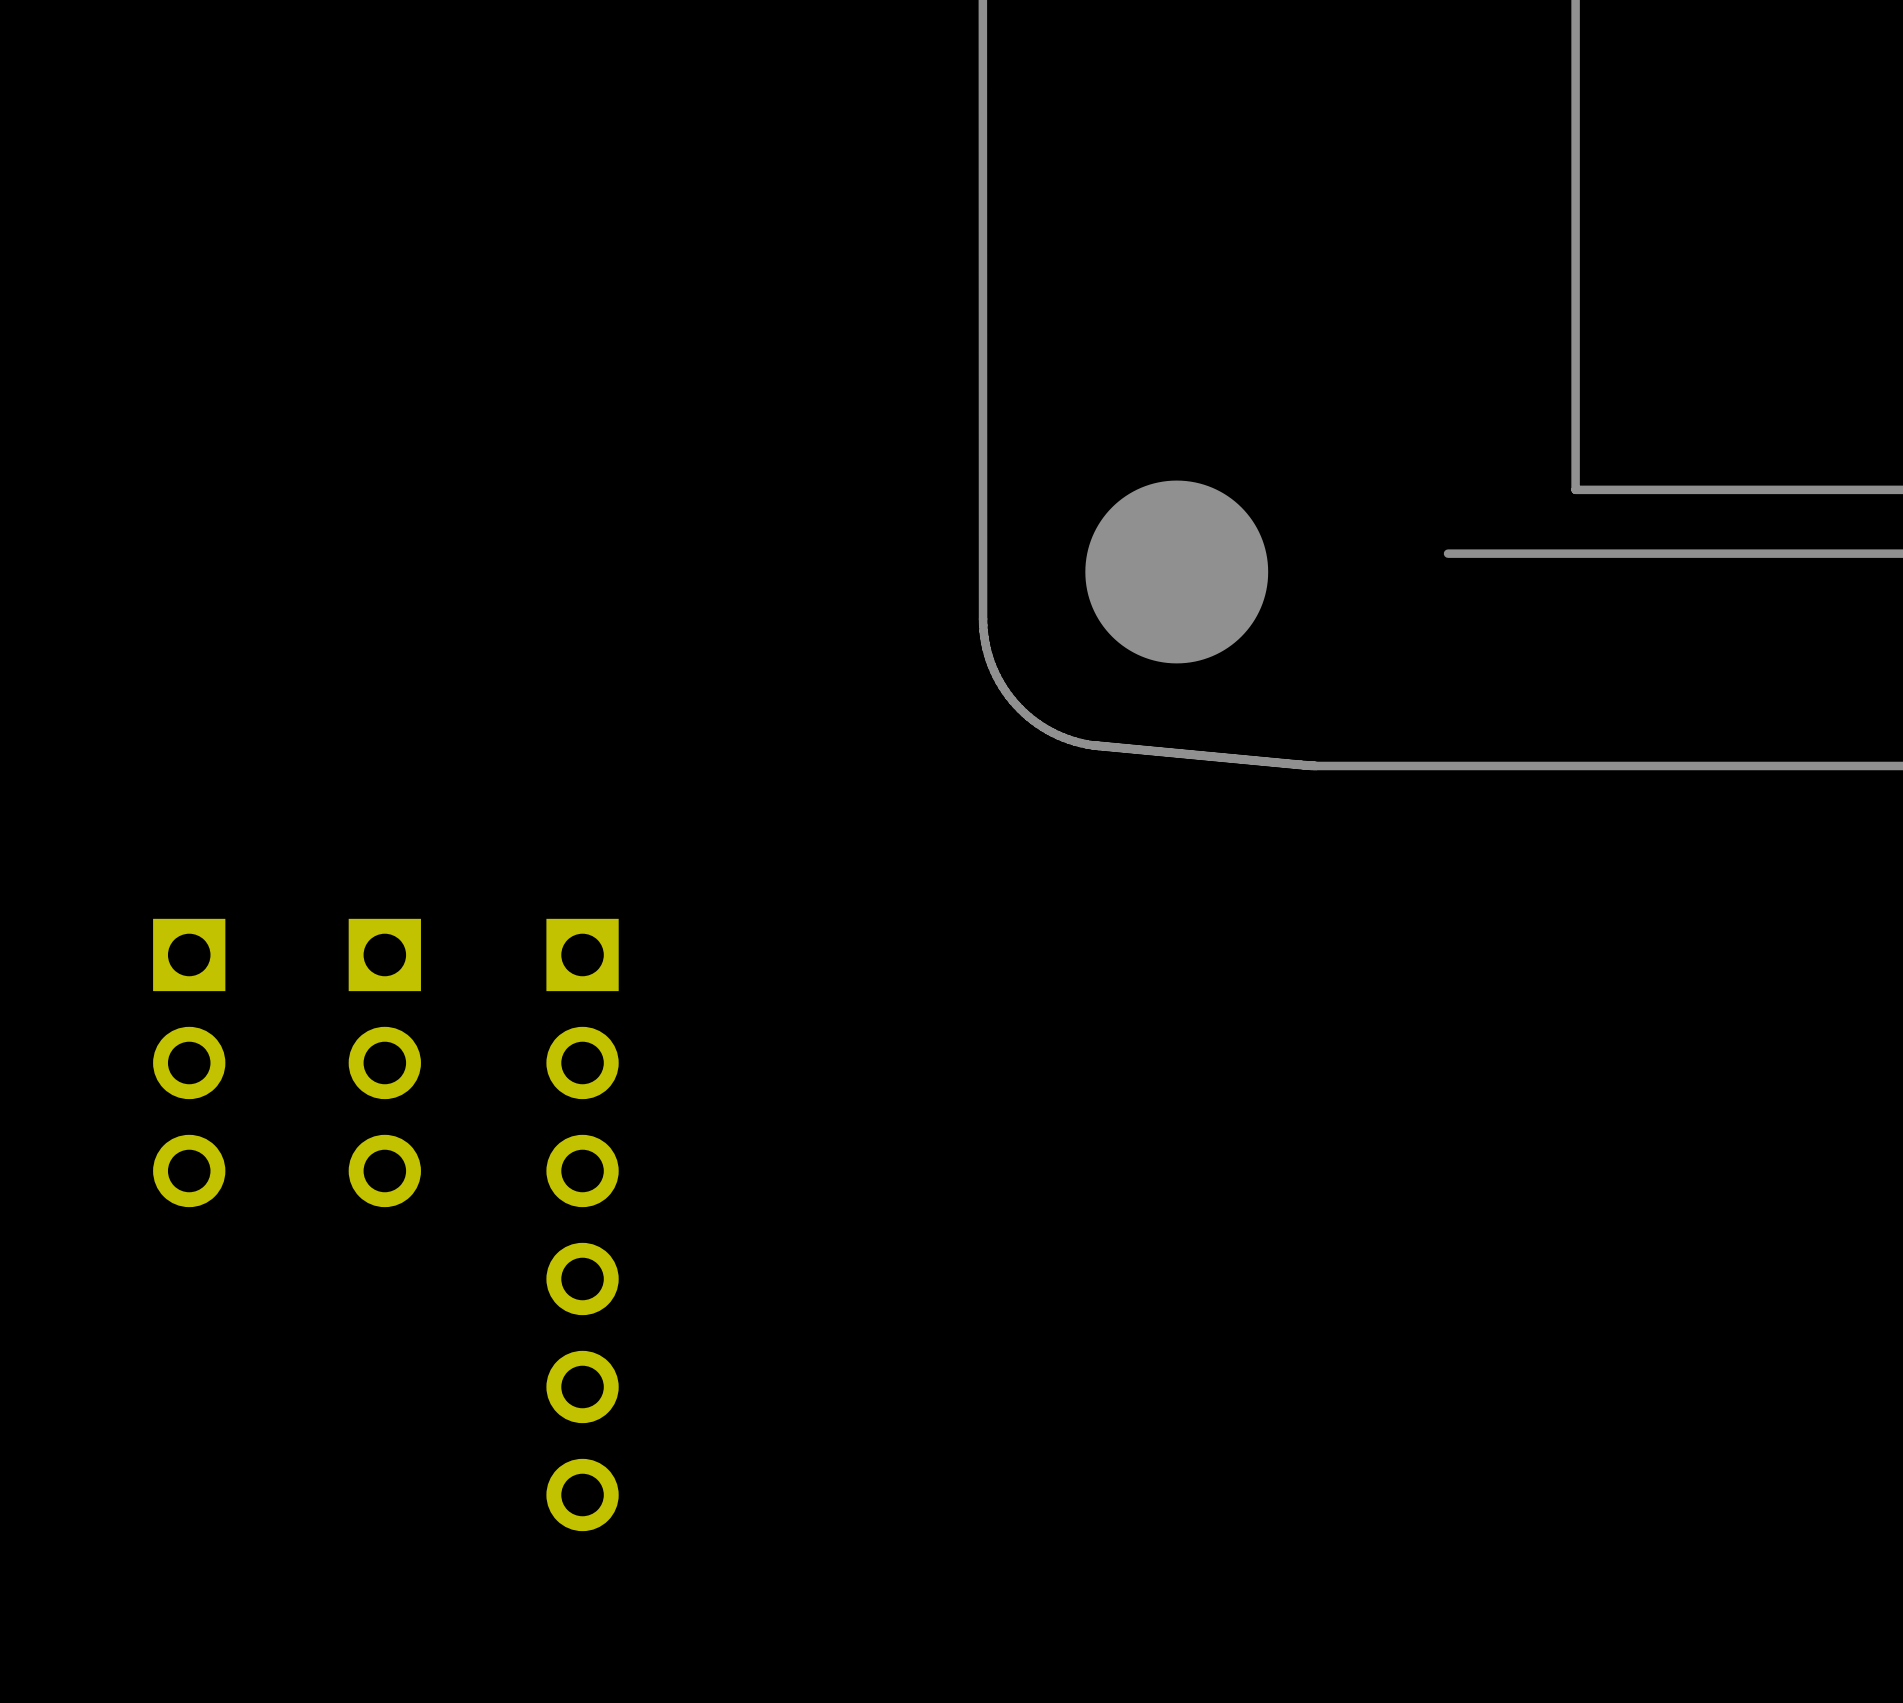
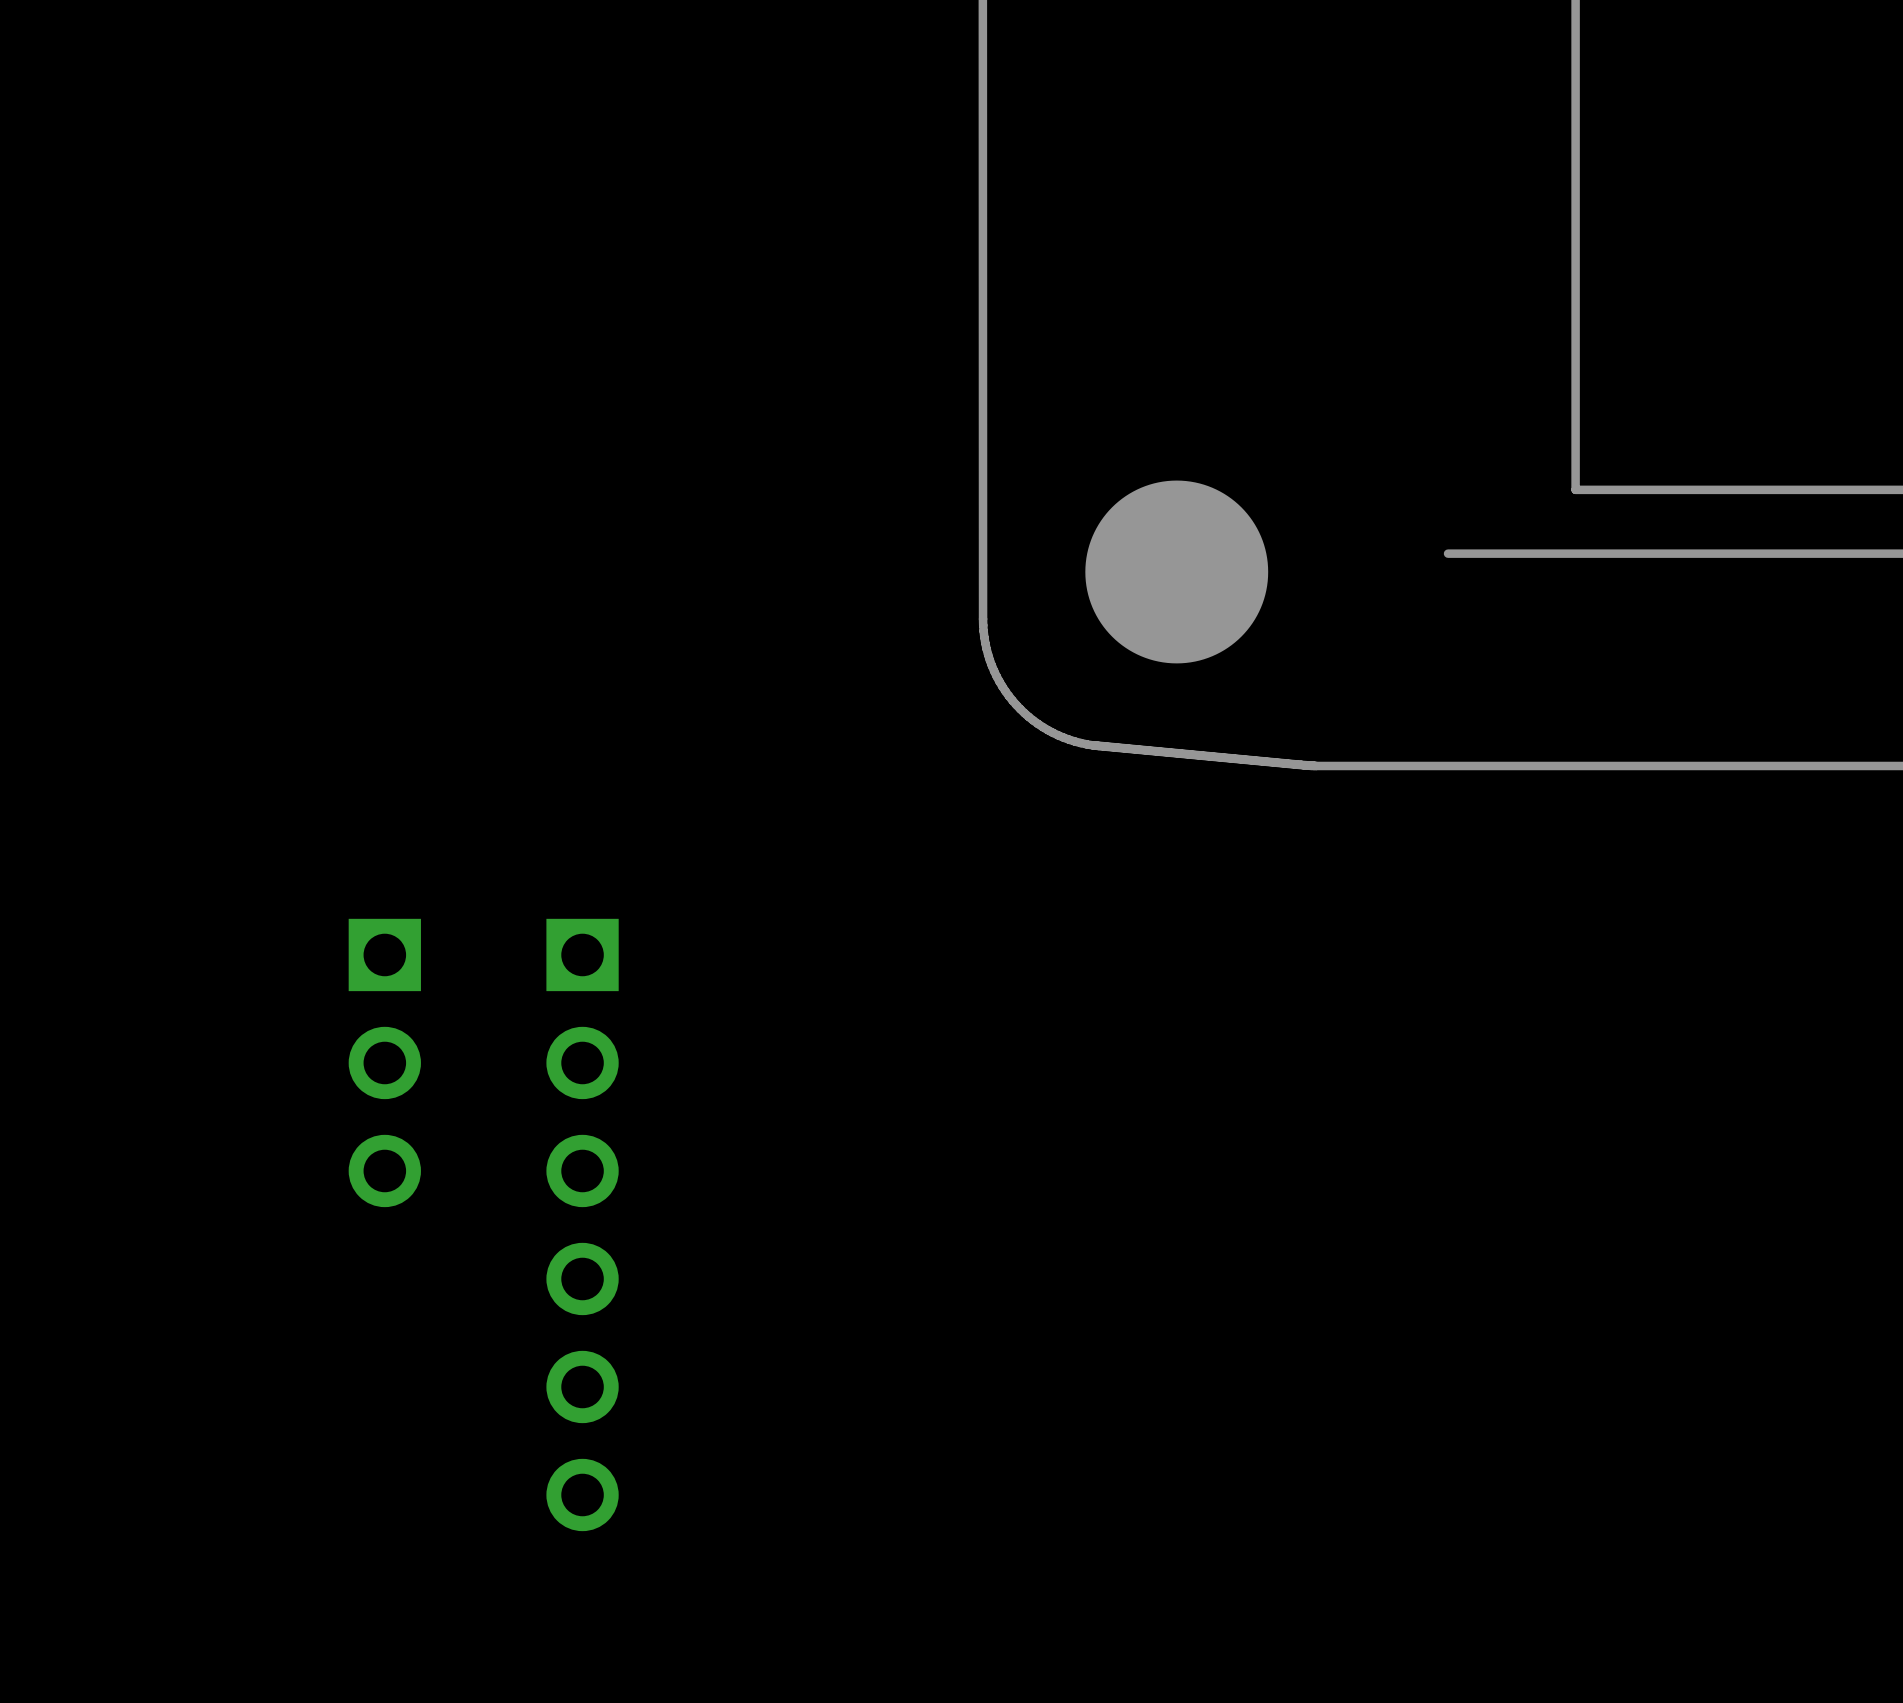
part: (189, 1062) -> none

